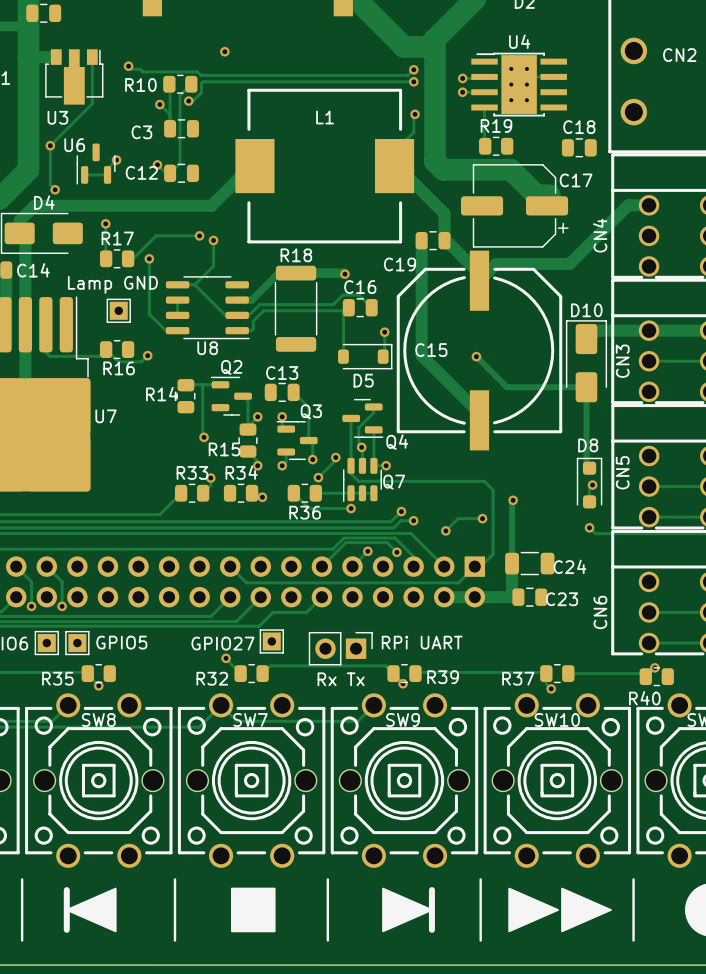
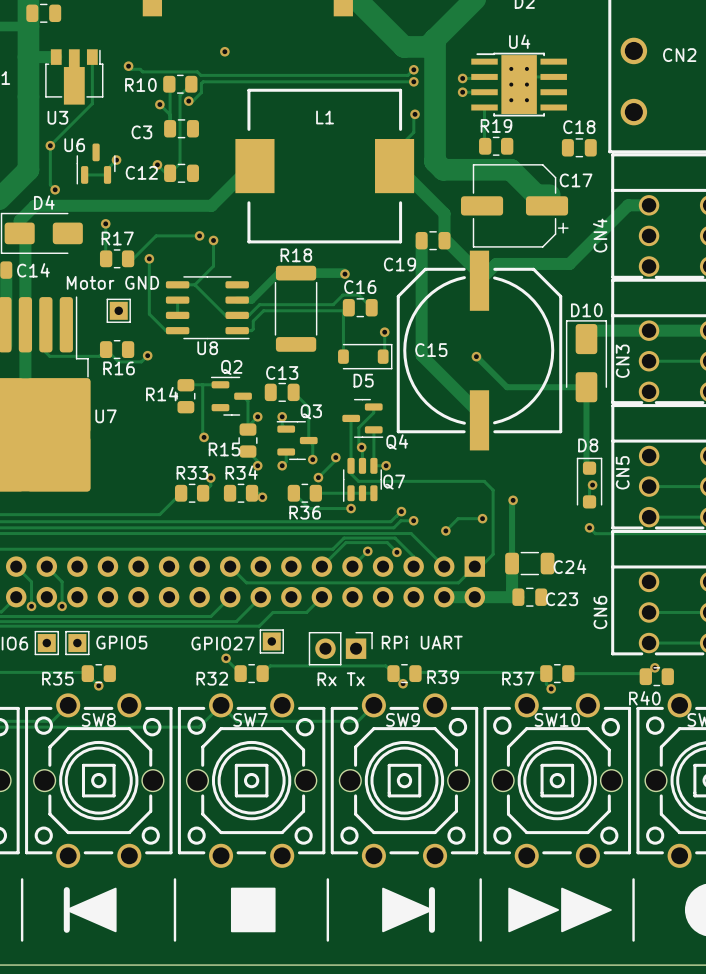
part text: Lamp GND (112, 284) -> Motor GND (112, 282)

